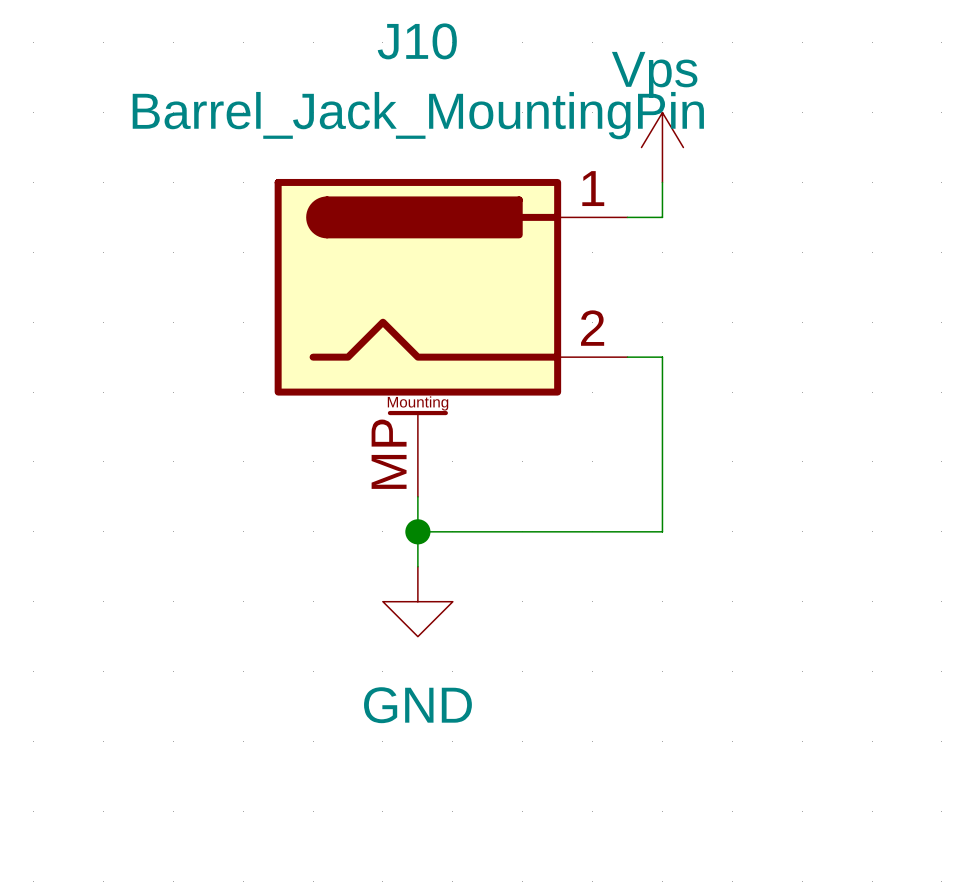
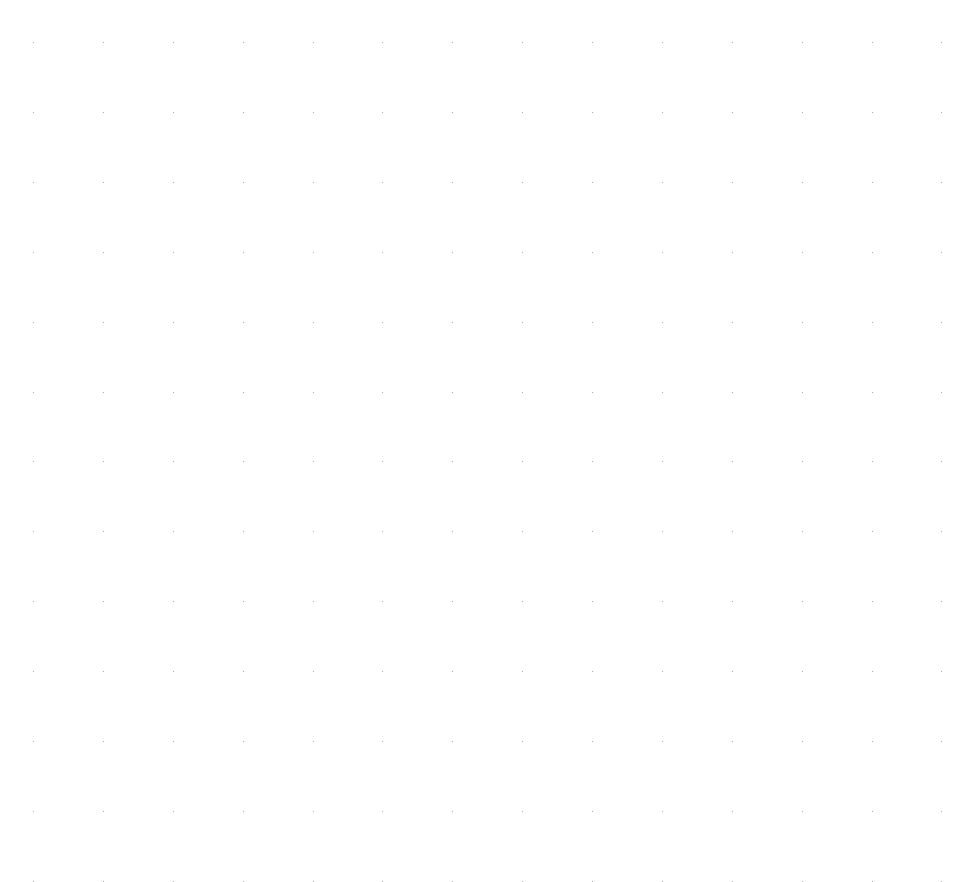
power symbol: Vps (662, 147) -> none
wire: (662, 182) (662, 217) (627, 217) -> none
J10: Barrel_Jack_MountingPin (451, 337) -> none
wire: (627, 357) (662, 357) (662, 531) (417, 531) -> none
wire: (417, 496) (417, 566) -> none
junction: (417, 531) -> none
power symbol: GND (417, 601) -> none

